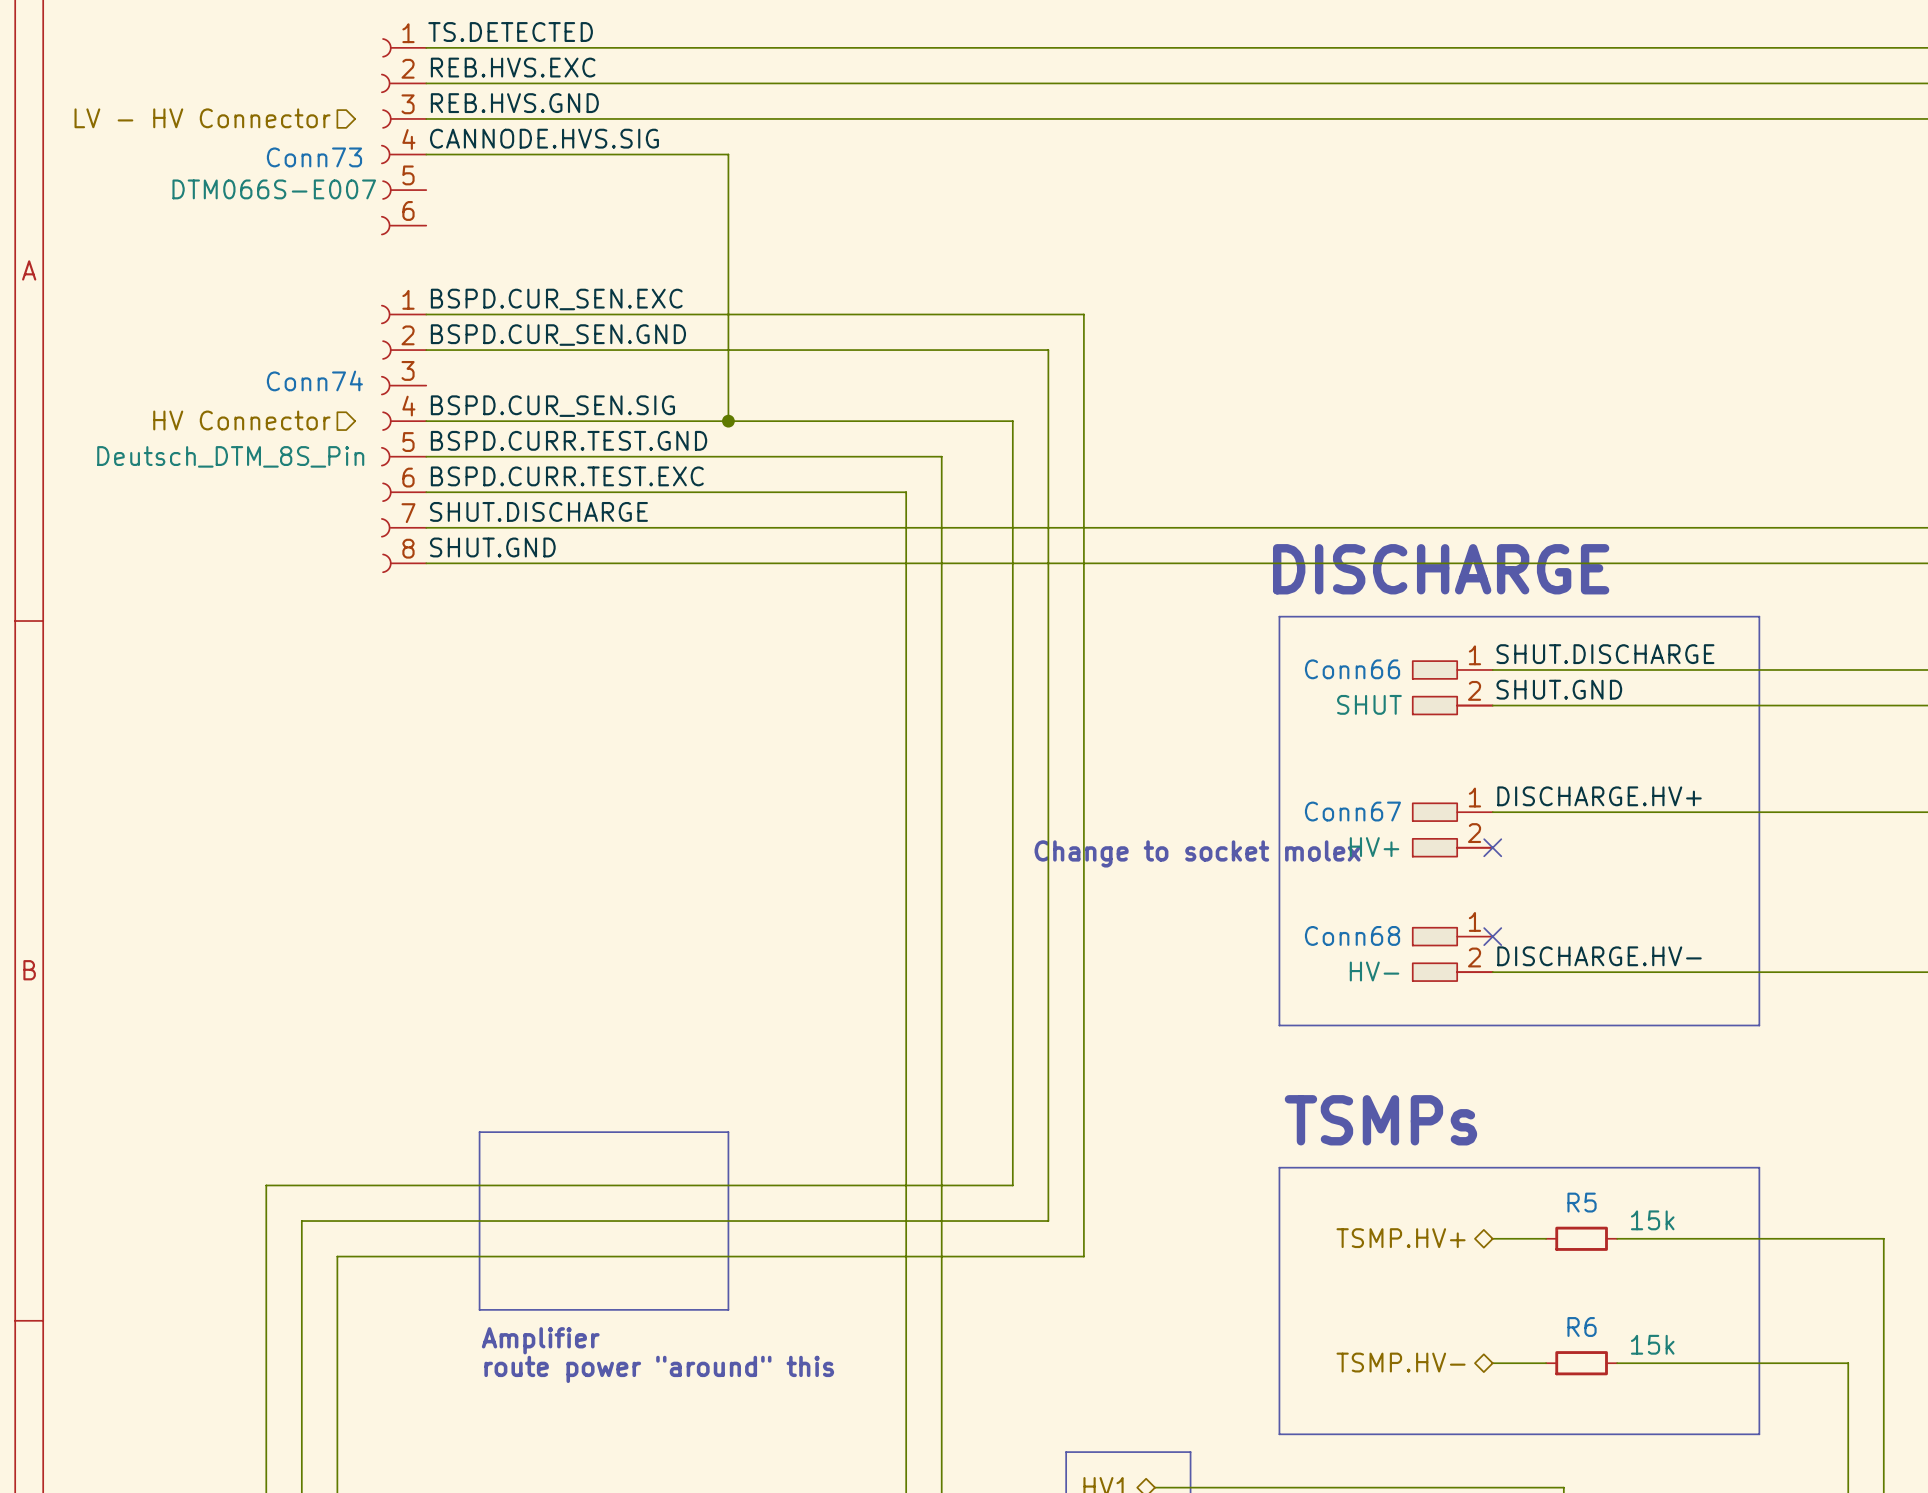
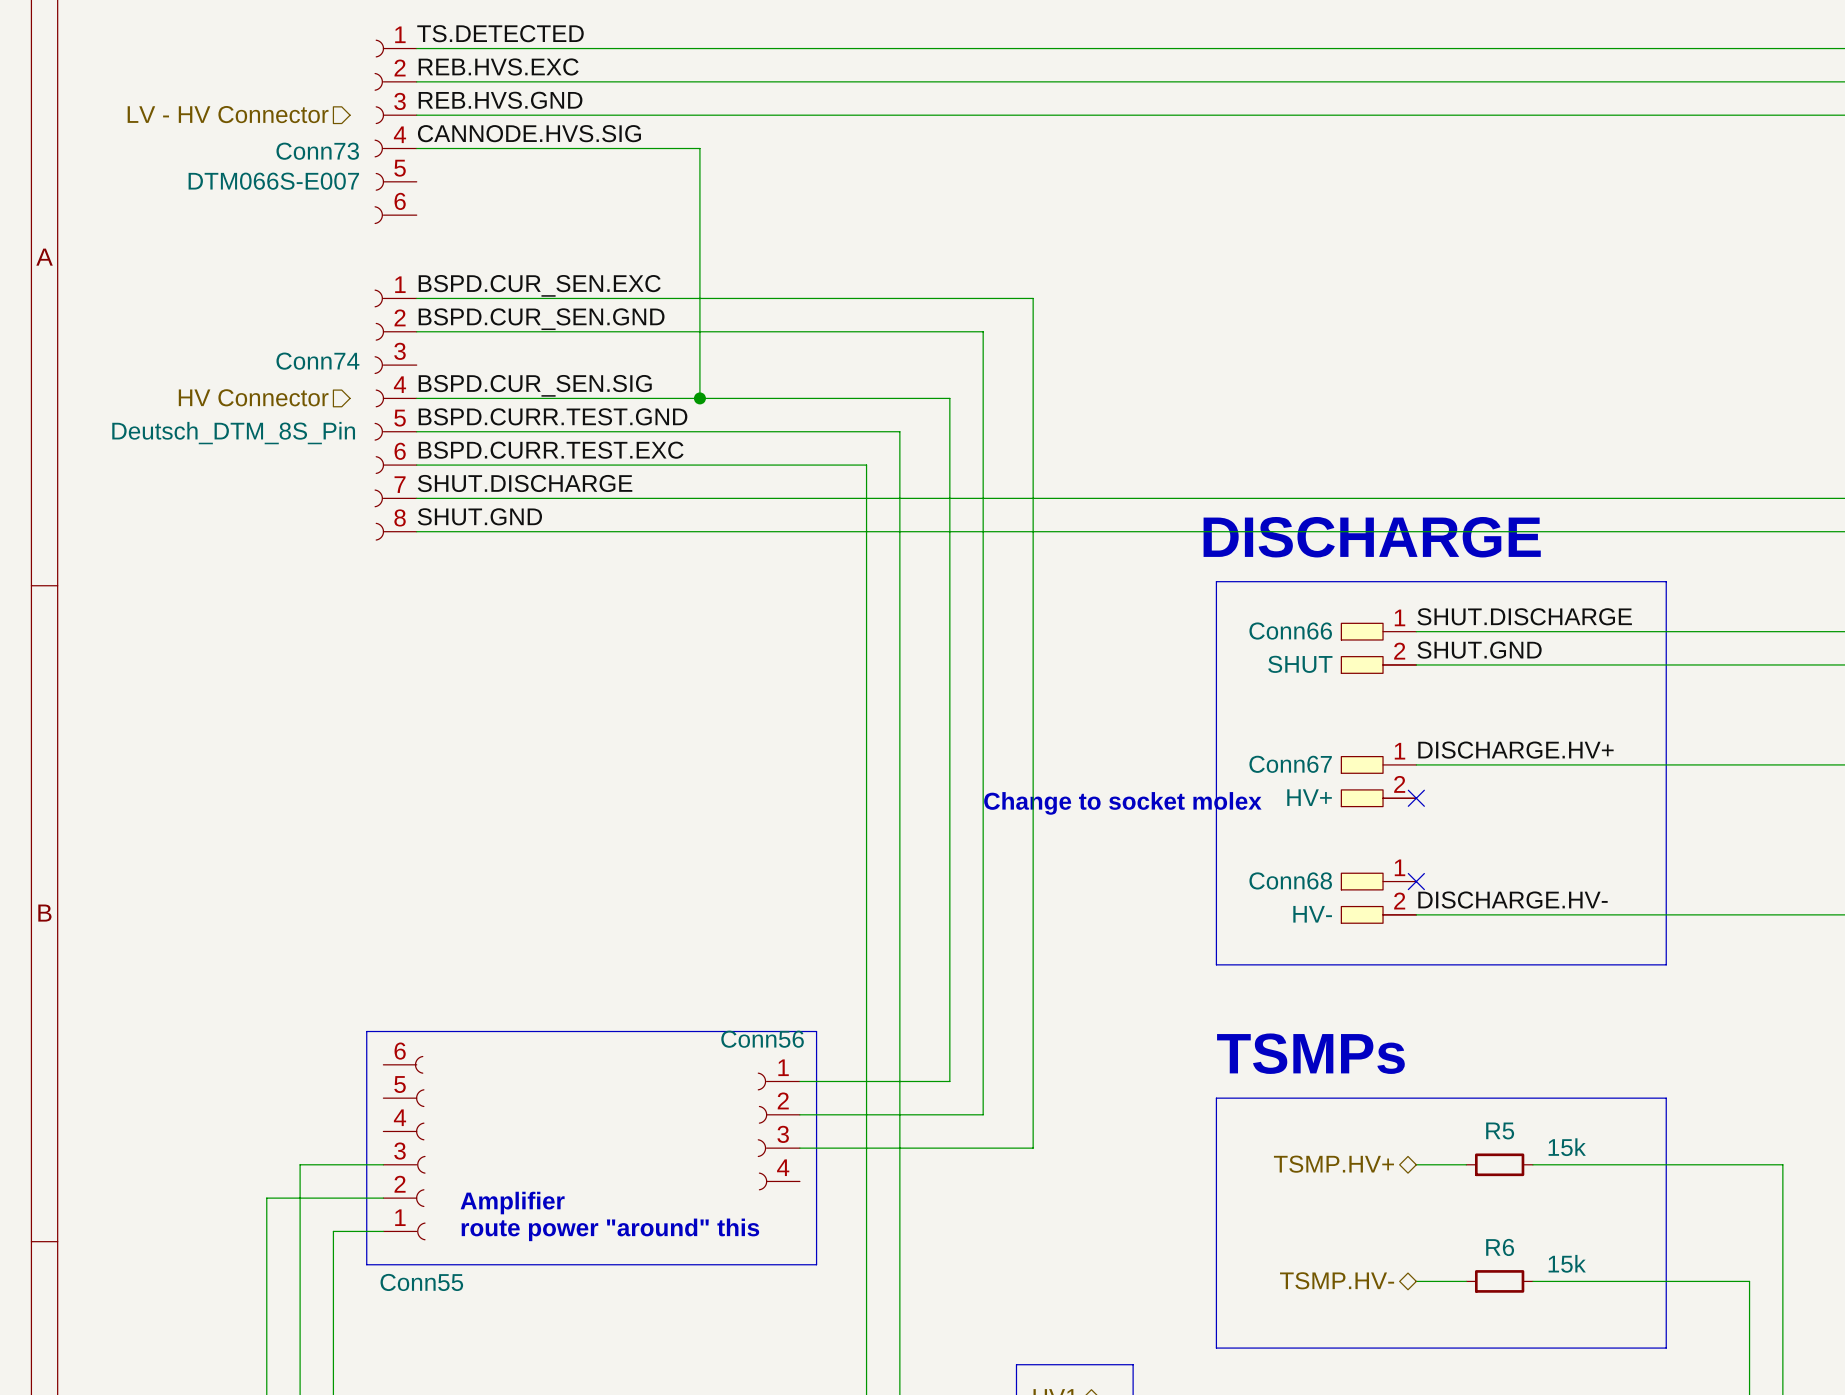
wire: (1030, 350) (1048, 350) (1048, 1221) -> (983, 331) (983, 1114) (966, 1114)
wire: (995, 421) (1012, 421) (1012, 1185) -> (949, 398) (949, 1081) (799, 1081)
line: none -> (366, 1031) (816, 1031) (816, 1264) (366, 1264) (366, 1031)
line: (479, 1132) (728, 1132) (728, 1309) (479, 1309) (479, 1132) -> none
wire: (835, 1185) (266, 1185) (266, 1274) -> (383, 1198) (266, 1198)
Conn56: none -> (779, 1131)
Conn55: none -> (404, 1148)
wire: (835, 1221) (301, 1221) (301, 1238) -> (383, 1164) (300, 1164)
wire: none -> (999, 1148) (1033, 1148)
wire: (1083, 1221) (1083, 1256) (337, 1256) (337, 1309) -> (383, 1231) (333, 1231)
text position: Amplifier (540, 1340) -> Amplifier (512, 1203)
text position: route power "around" this (659, 1369) -> route power "around" this (610, 1229)

